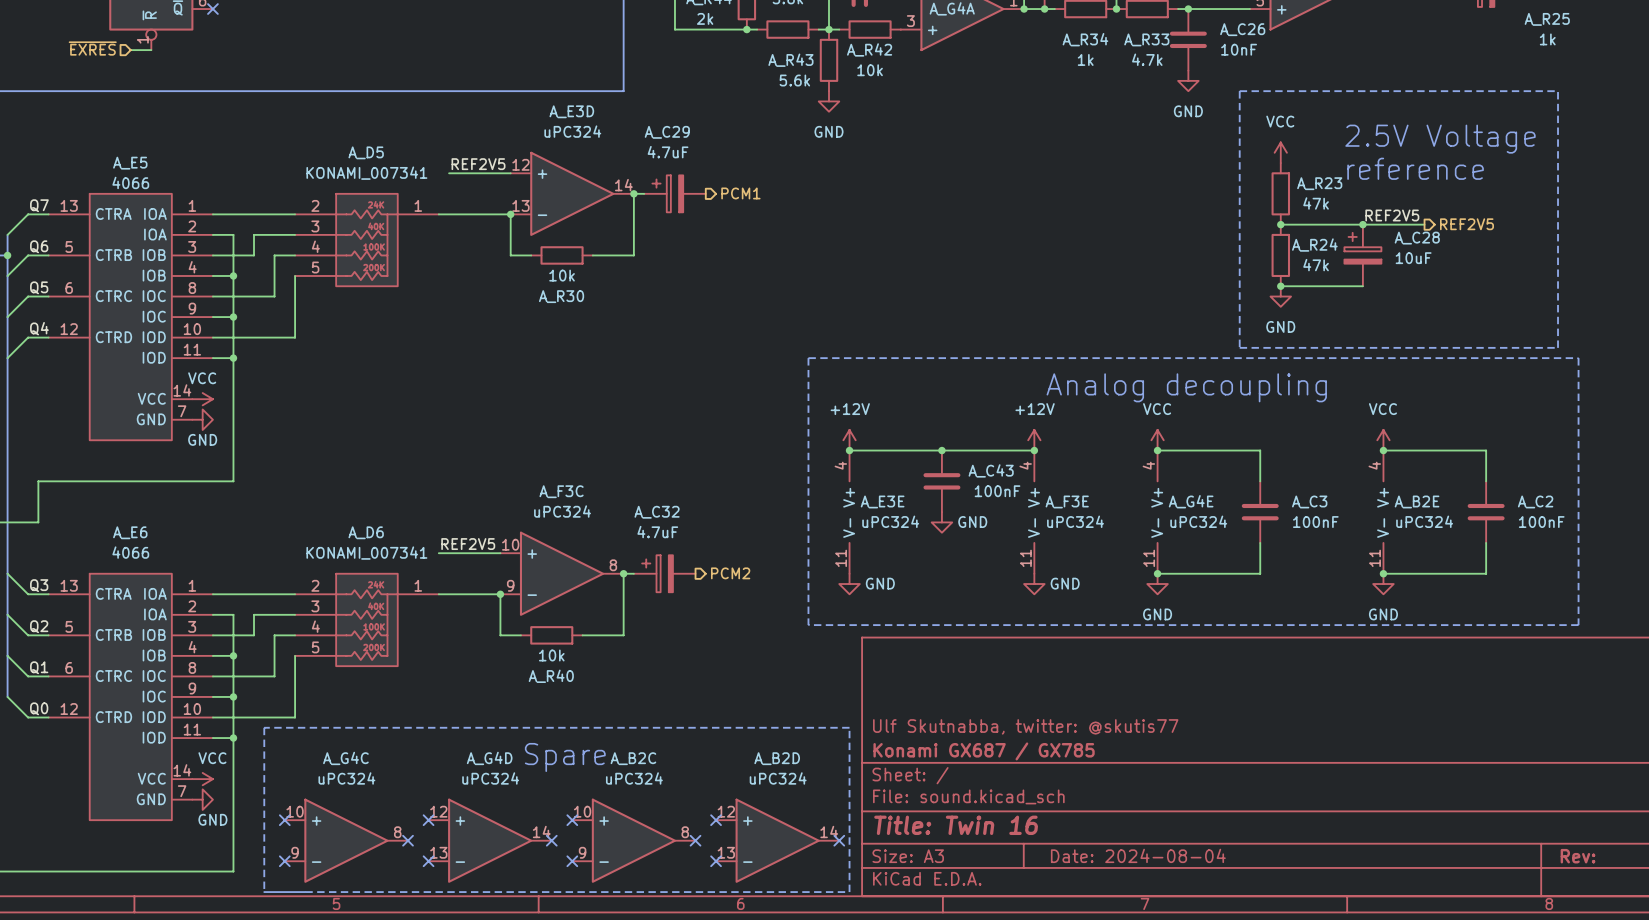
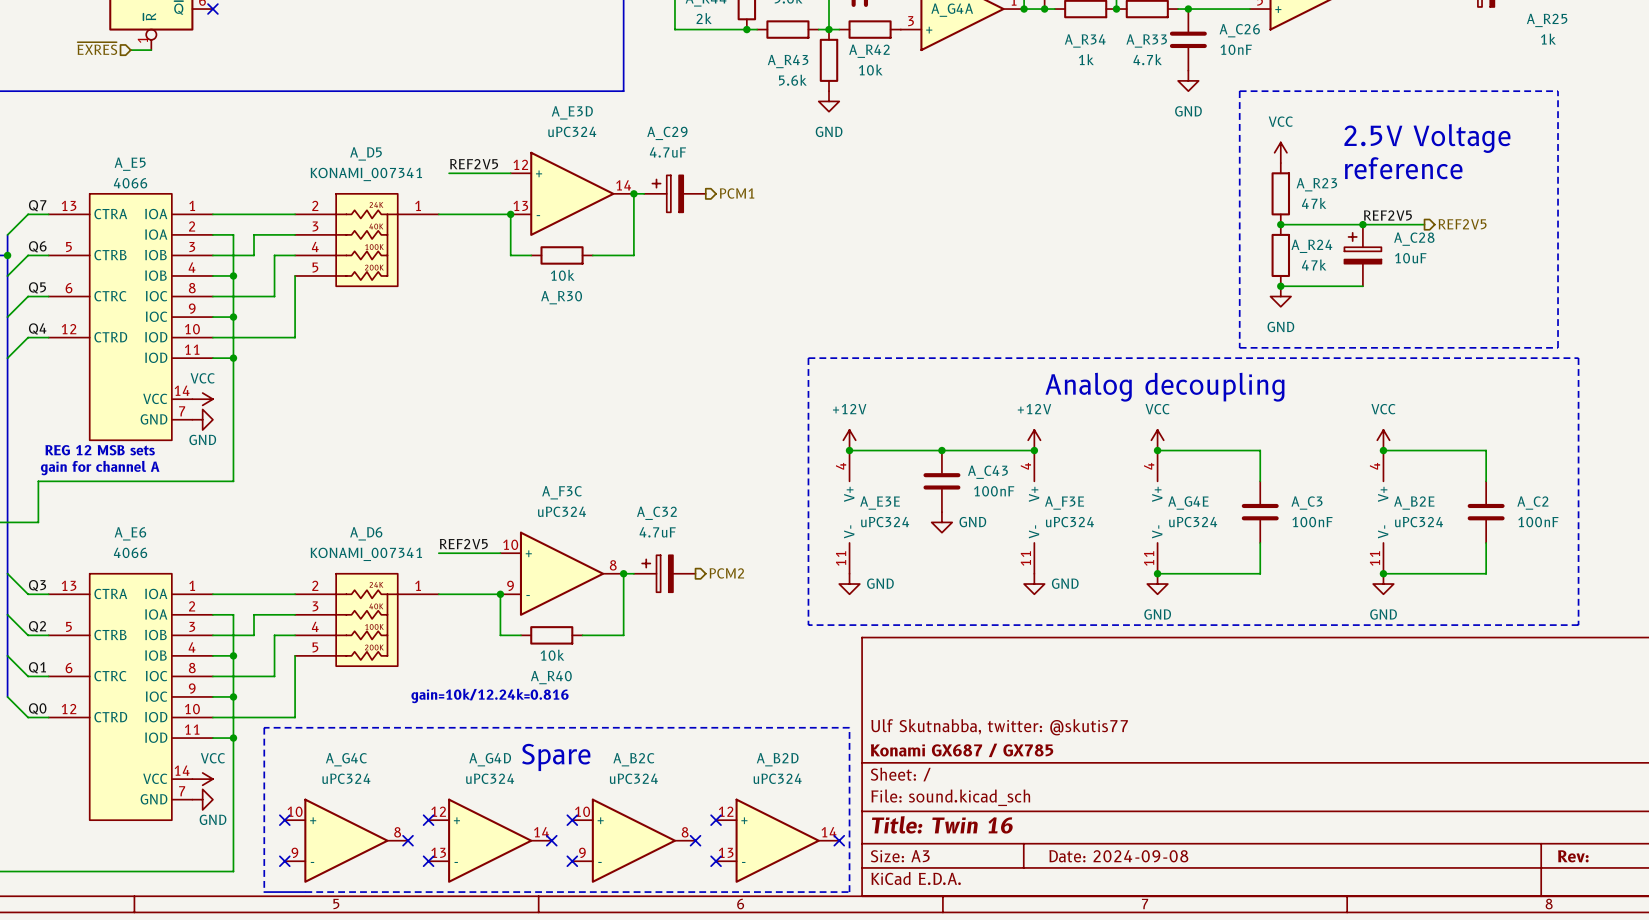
text: none -> REG 12 MSB sets (100, 450)
text: none -> gain for channel A (100, 468)
text: none -> gain=10k/12.24k=0.816 (490, 695)
title block: Date: 2024-08-04 (1138, 855) -> Date: 2024-09-08 (1118, 856)

